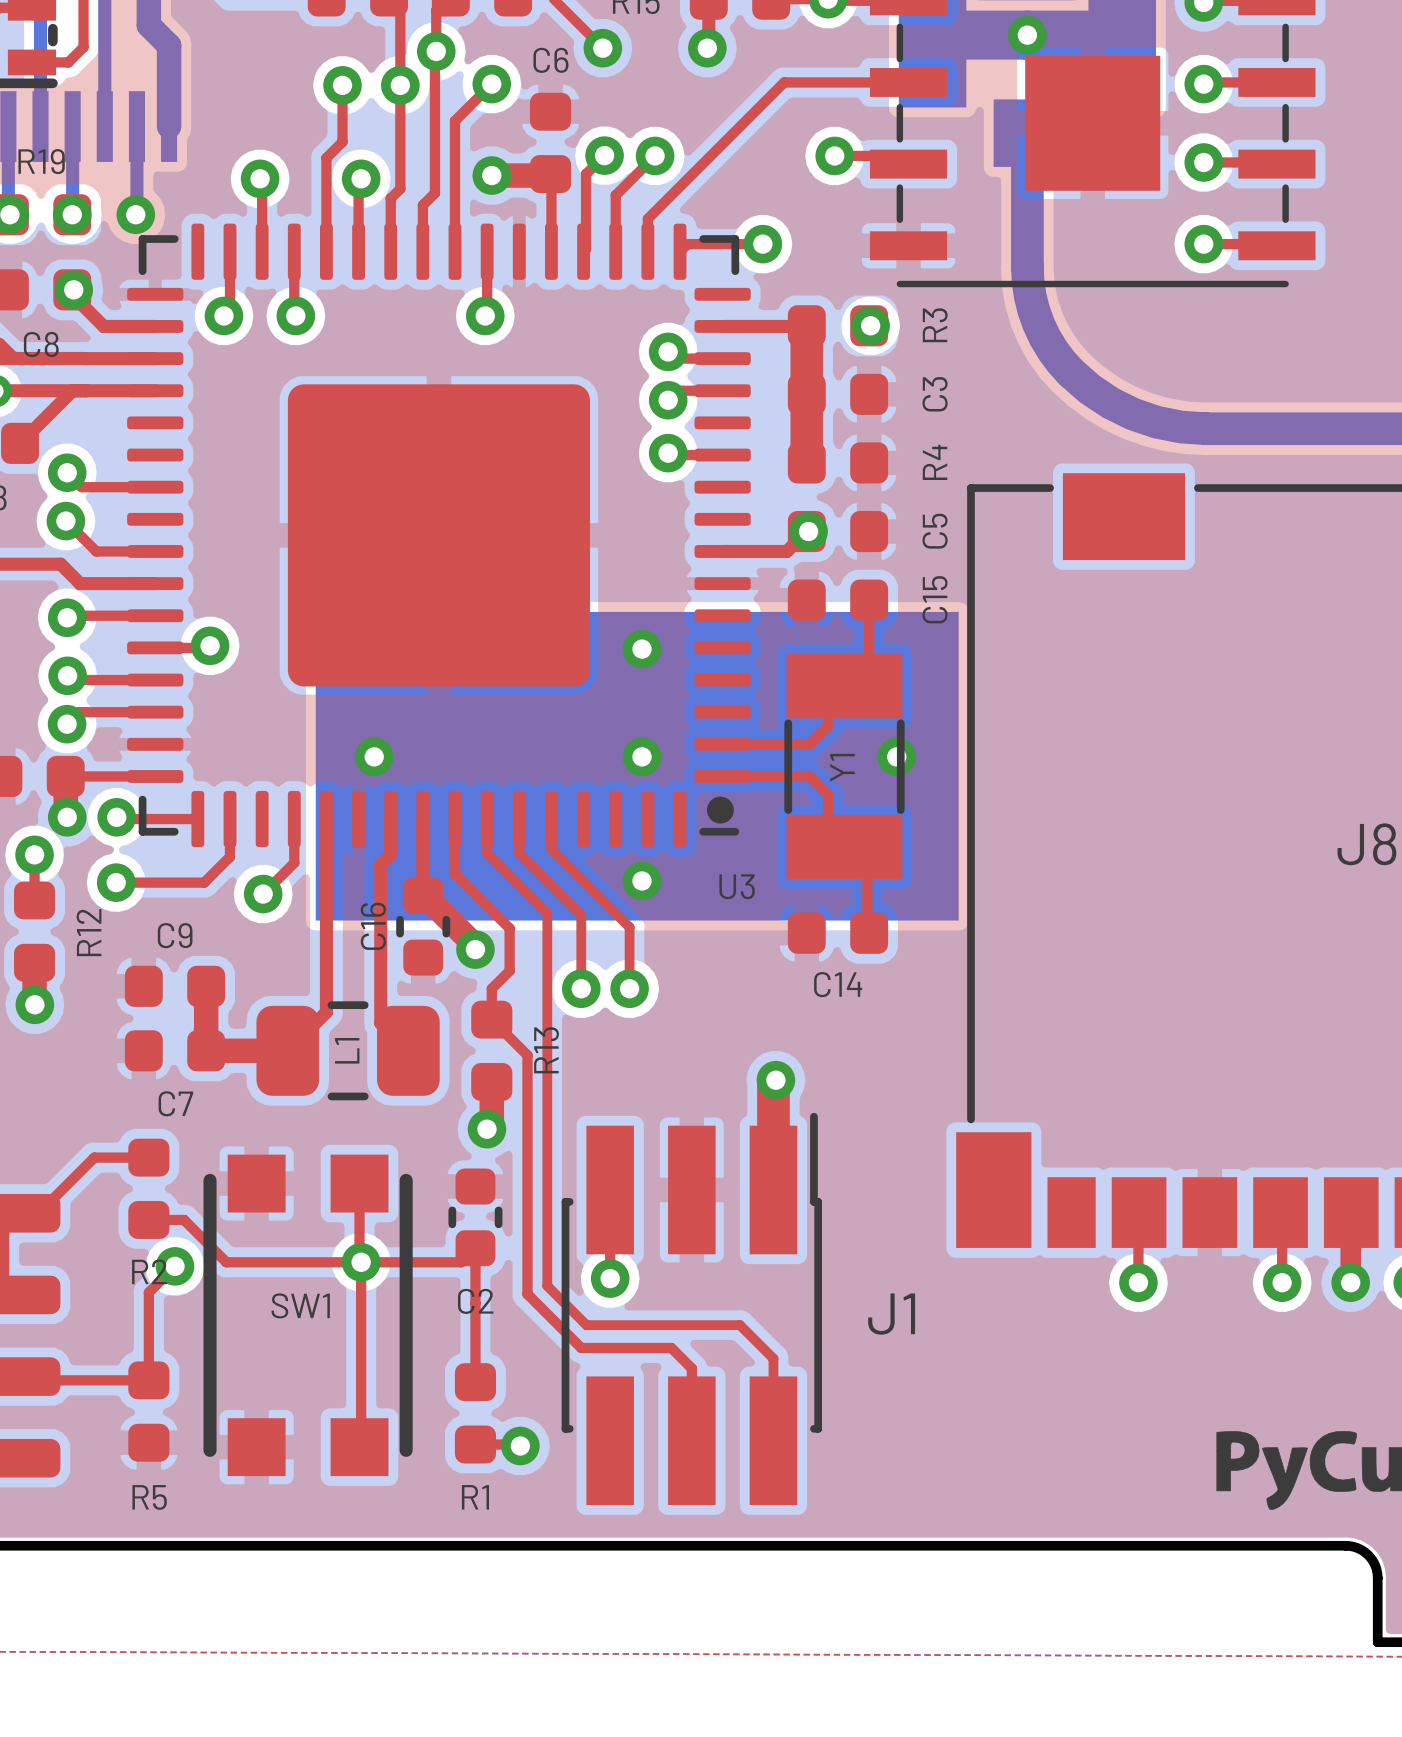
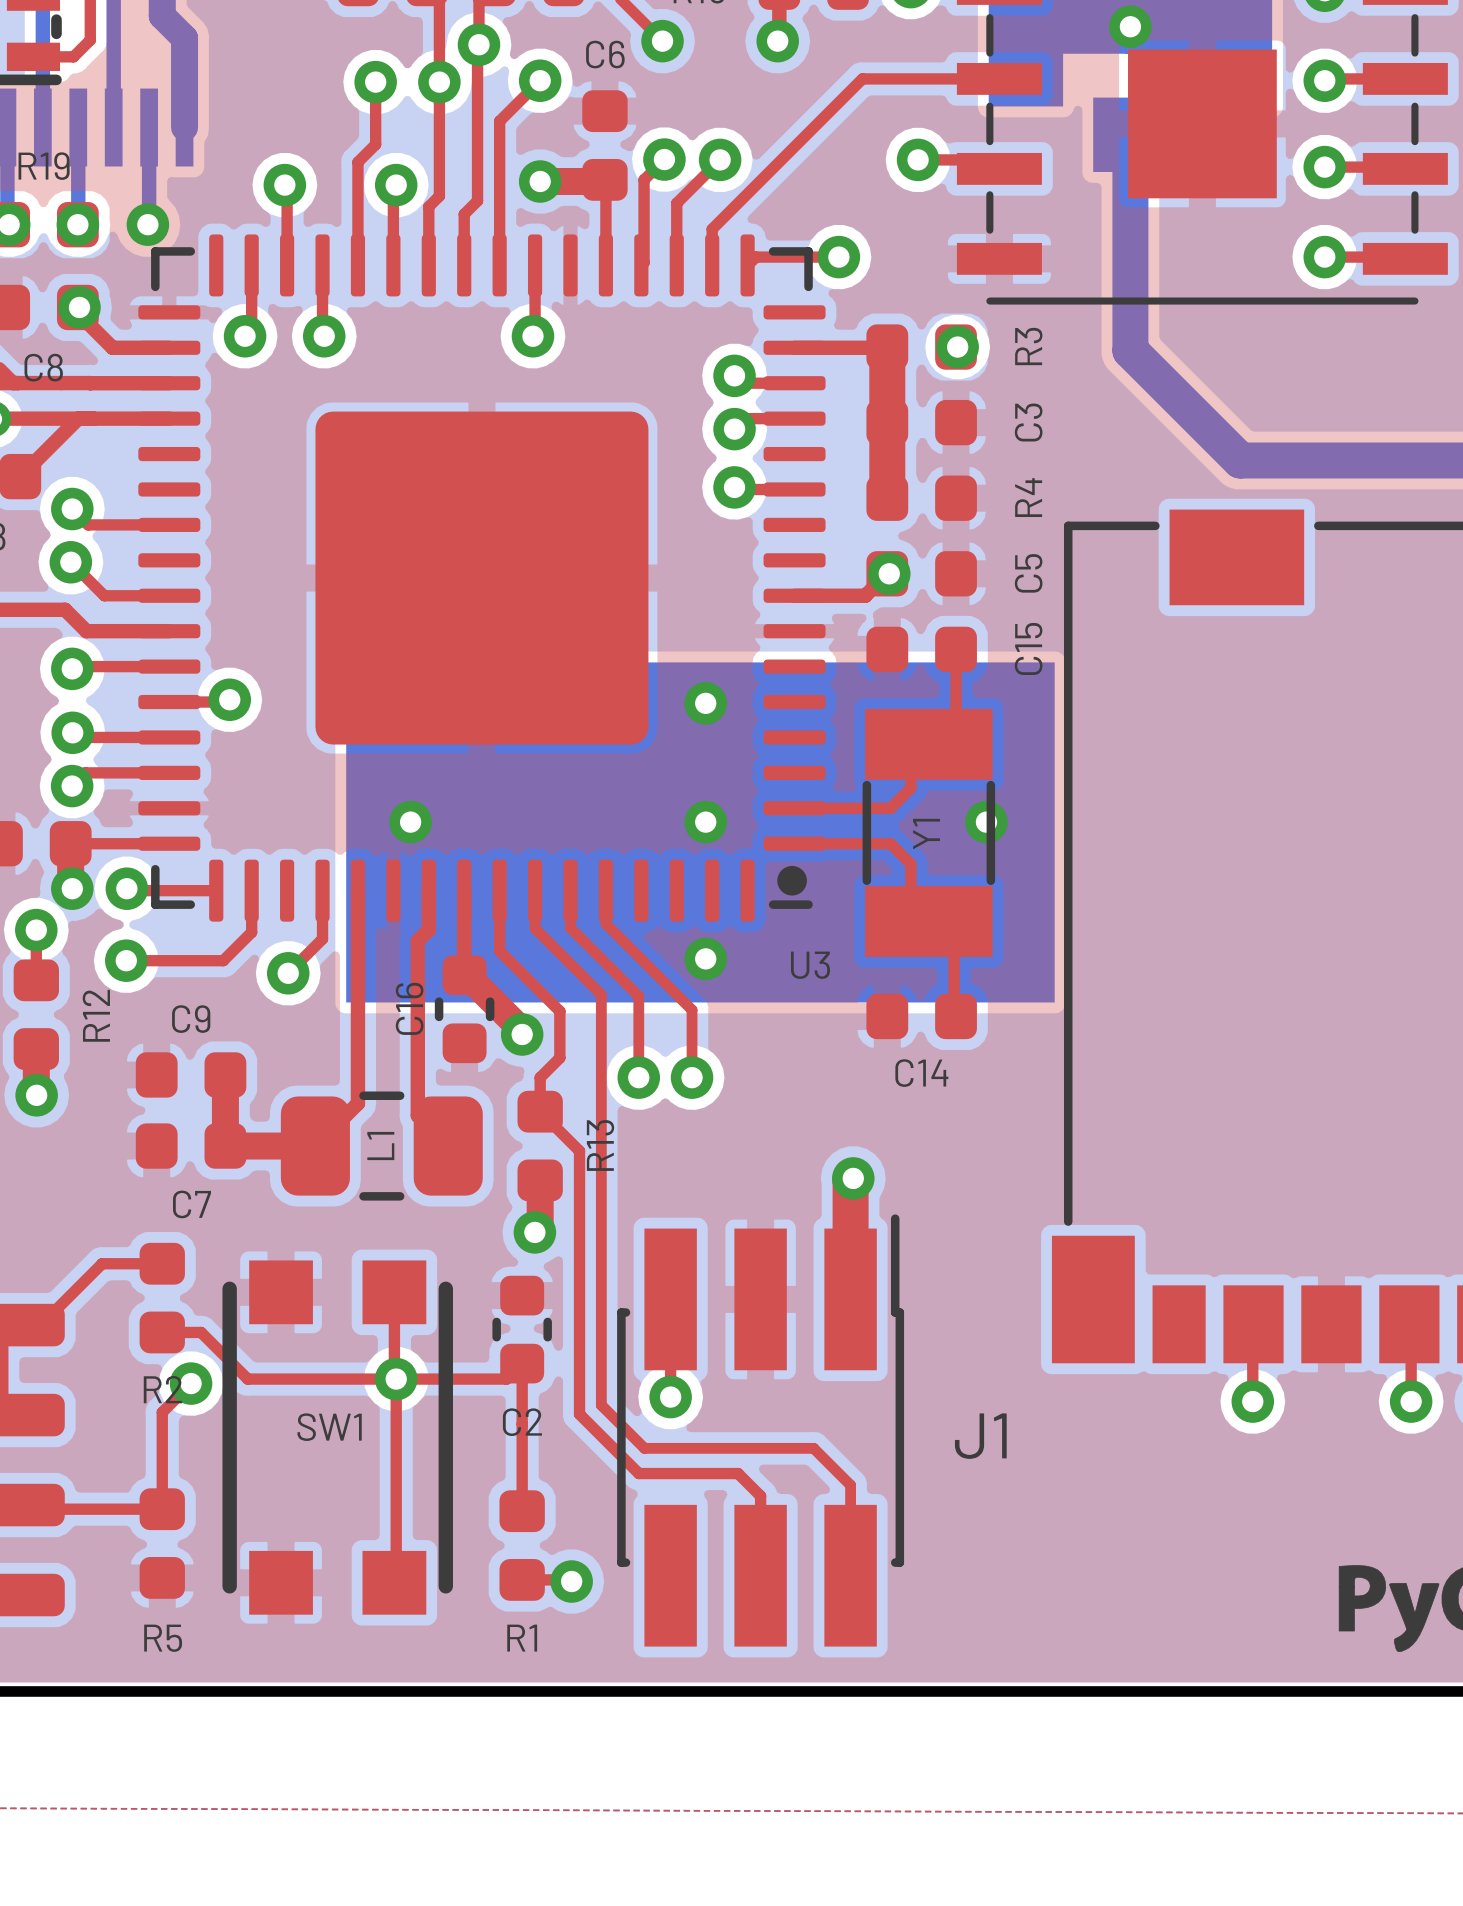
bottom track: (1027, 267) (1030, 296) (1038, 324) (1052, 350) (1070, 372) (1089, 389) (1110, 403) (1133, 414) (1156, 422) (1181, 427) (1206, 428) -> (1130, 282) (1130, 350) (1240, 460) (1327, 460)

